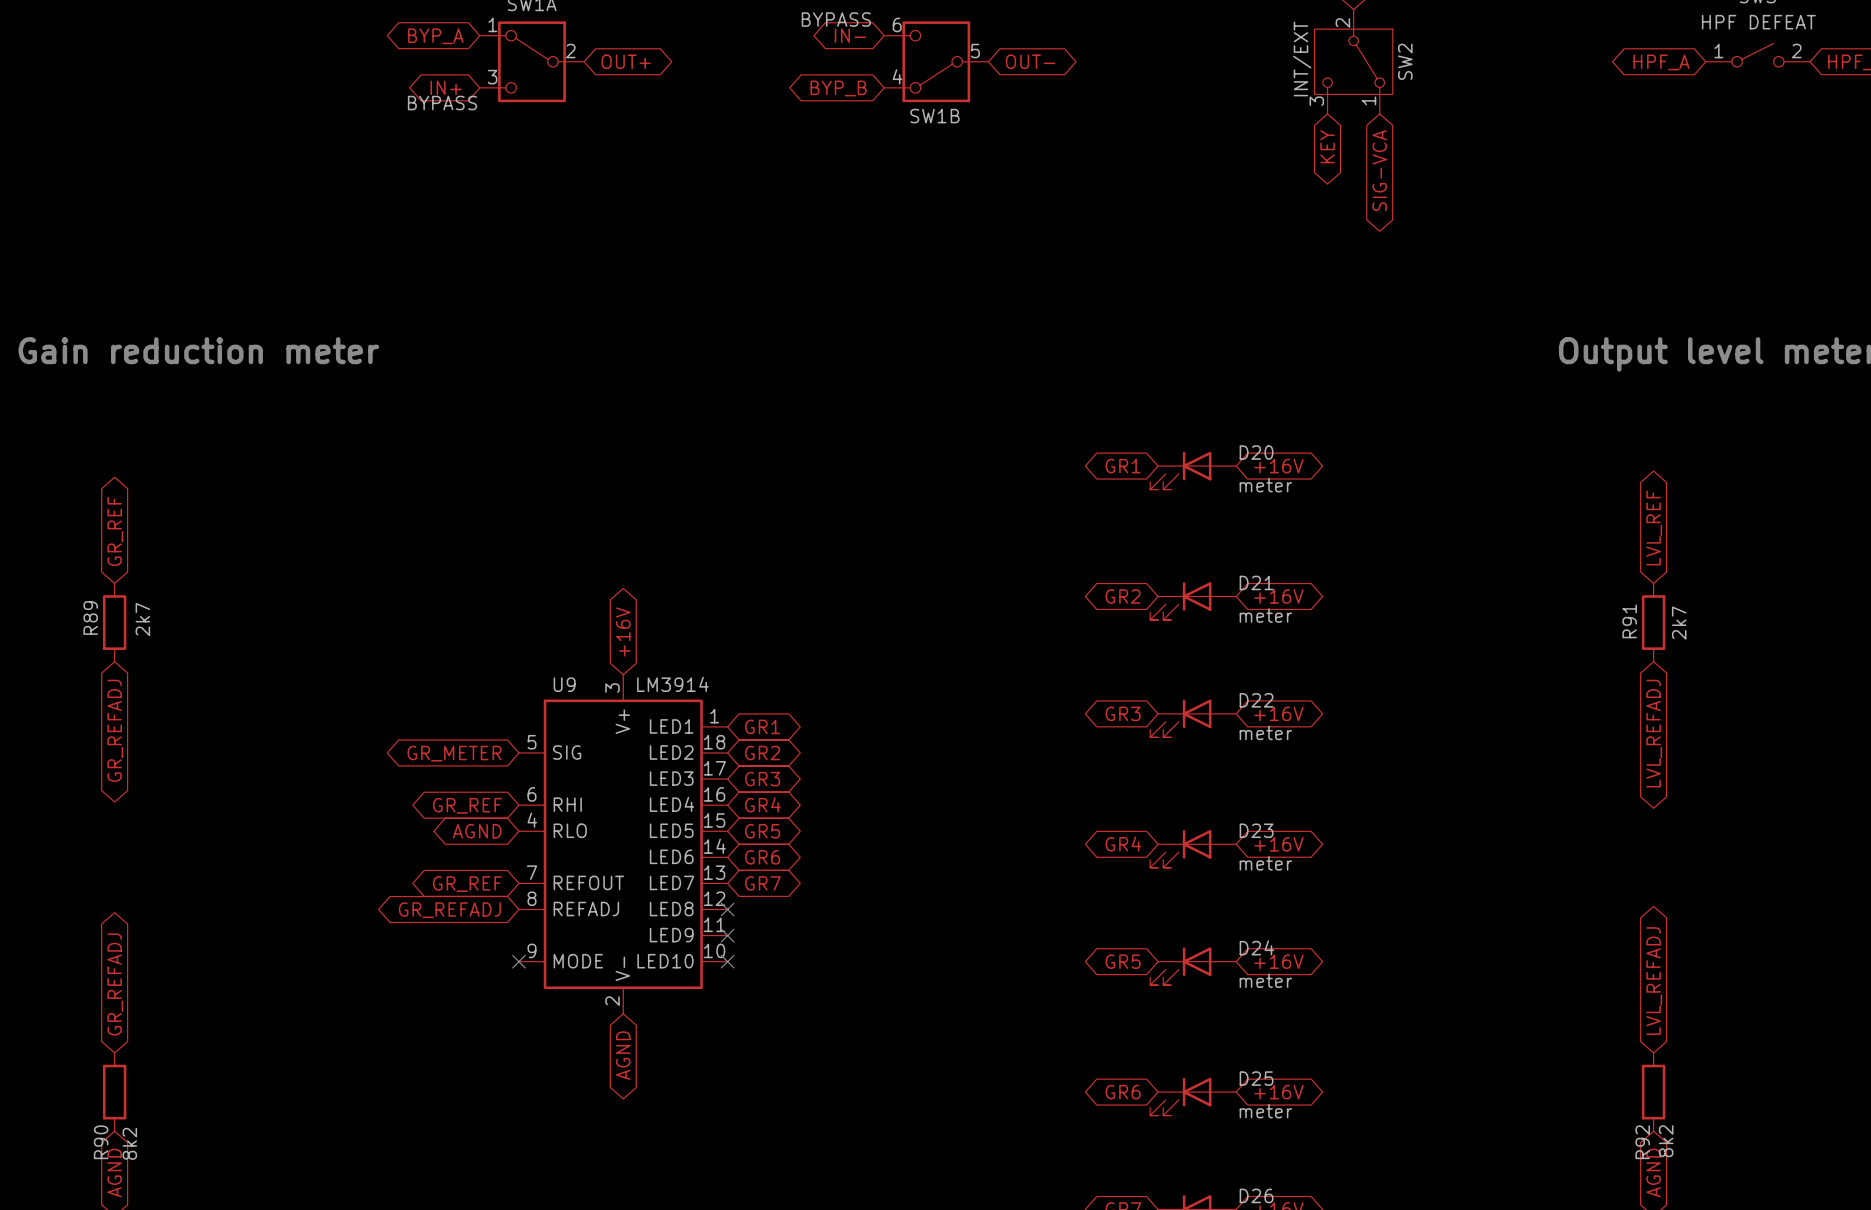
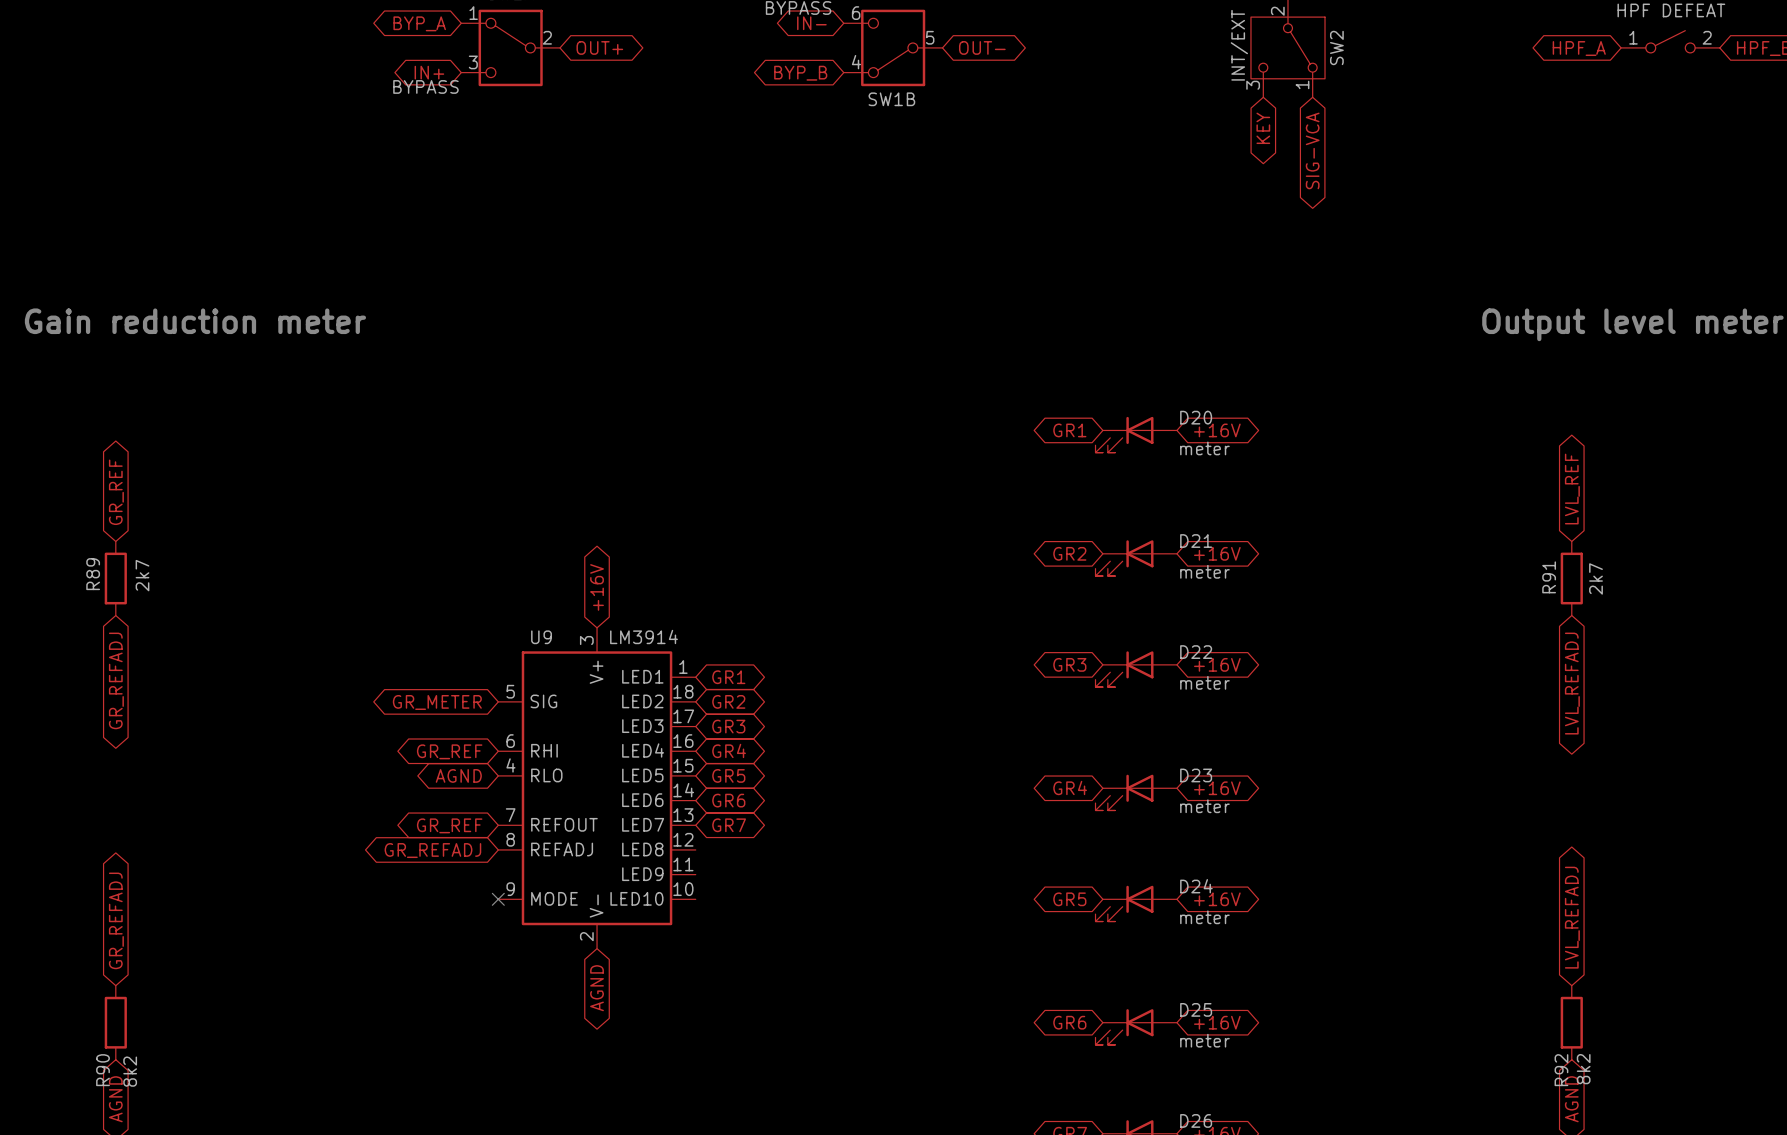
no-connect mark: (727, 909) -> none
no-connect mark: (727, 935) -> none
no-connect mark: (727, 961) -> none

